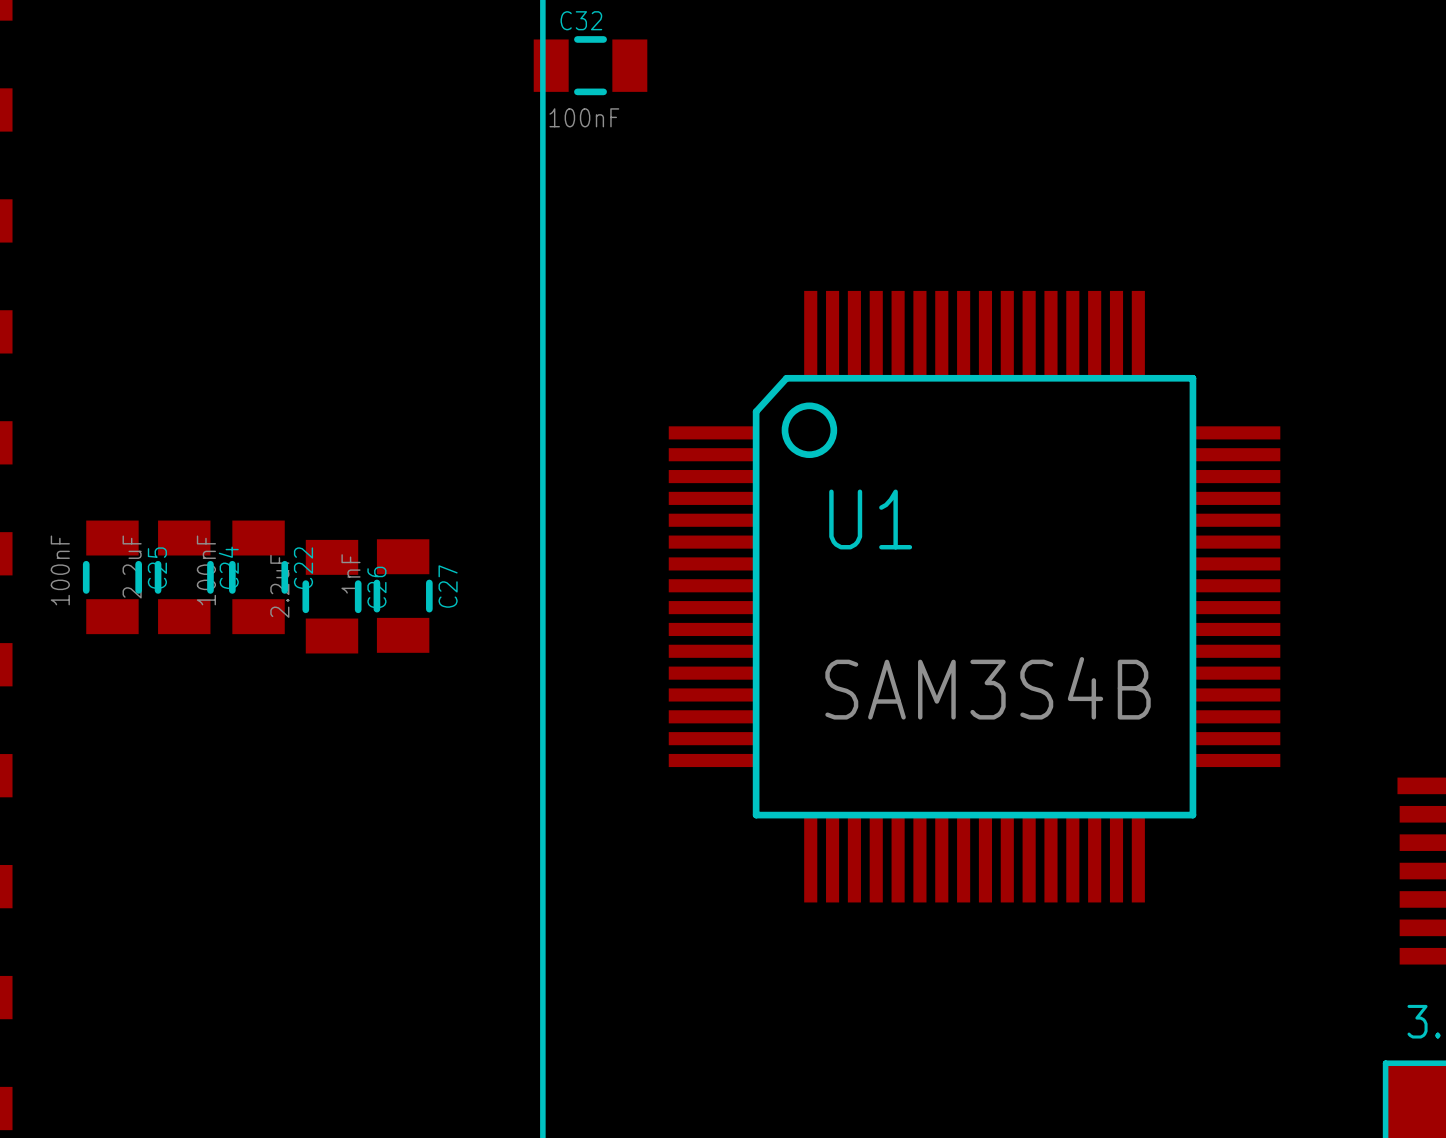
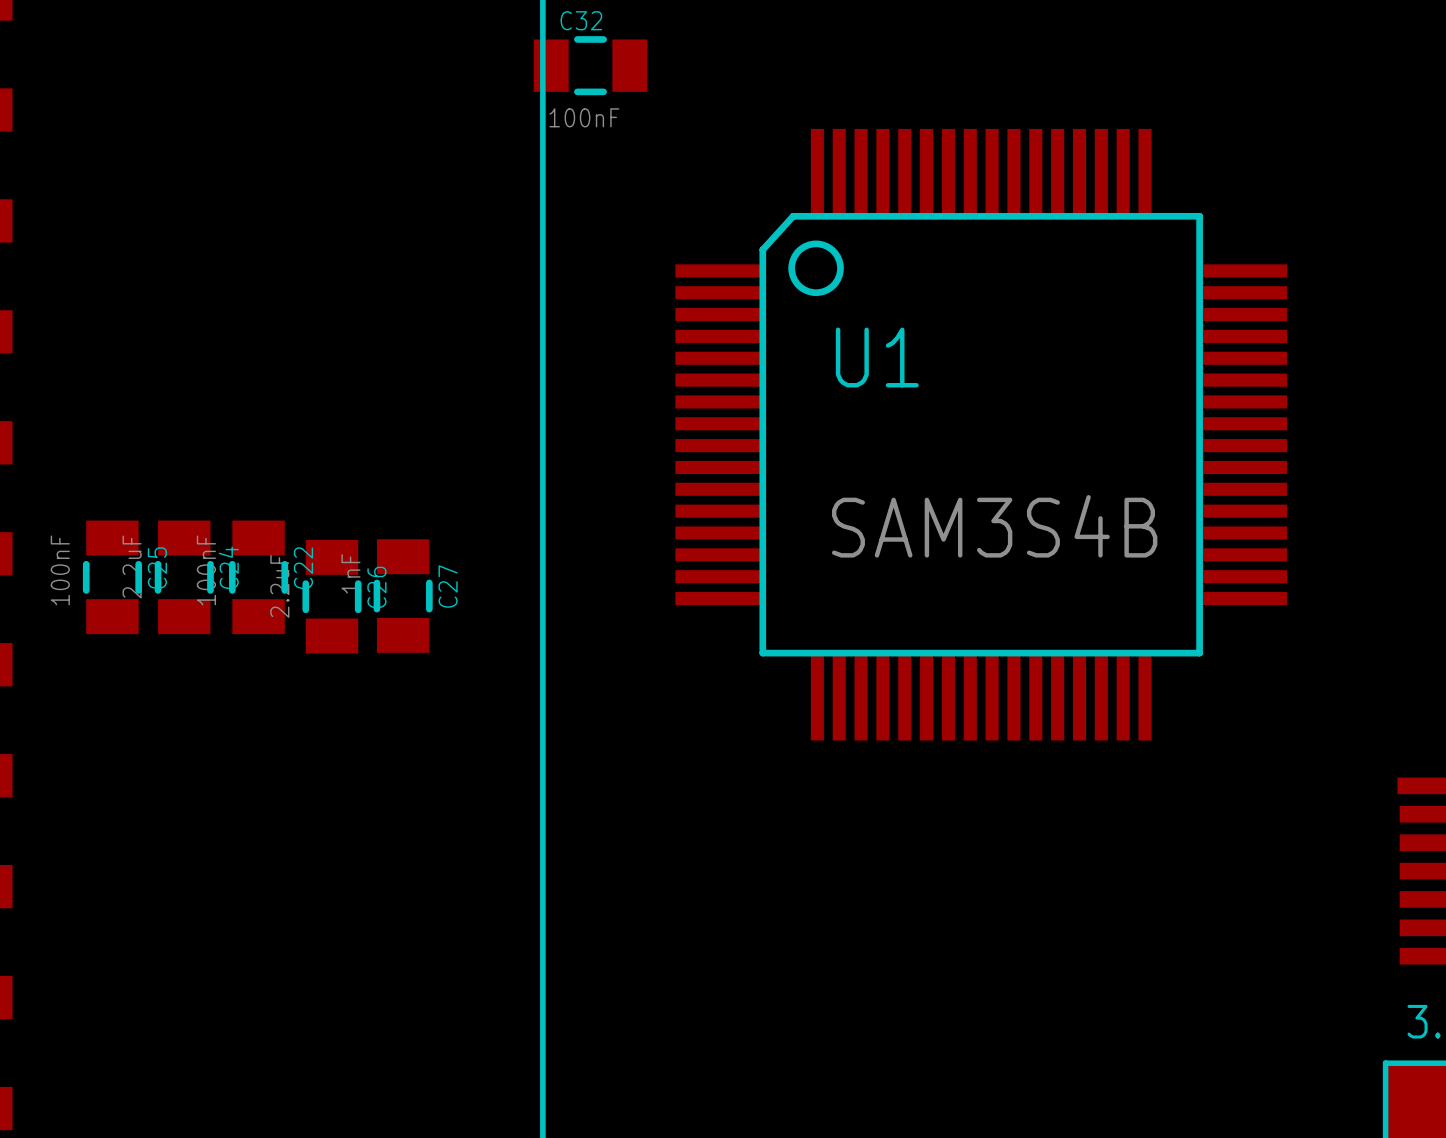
U1 position: (974, 596) -> (981, 434)

